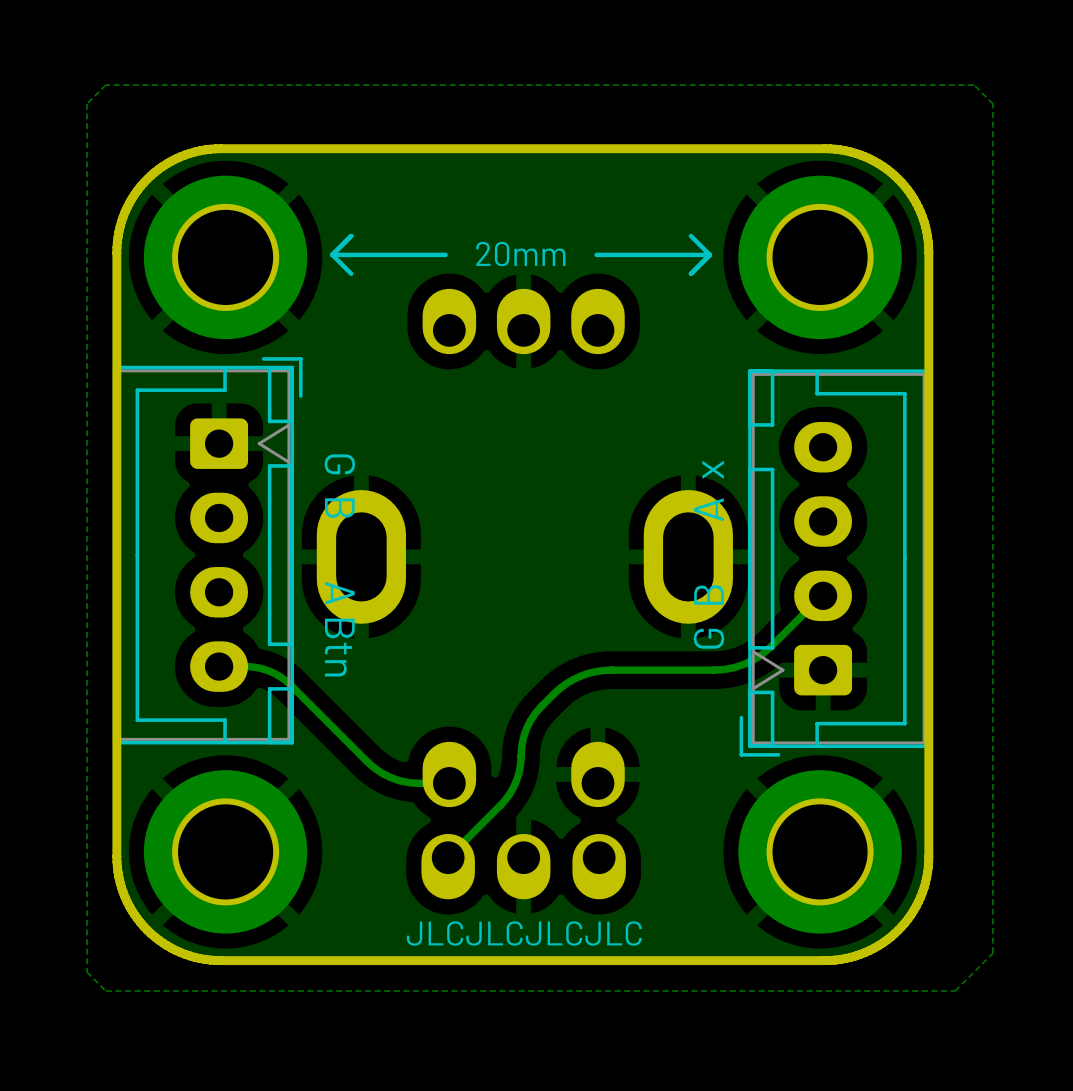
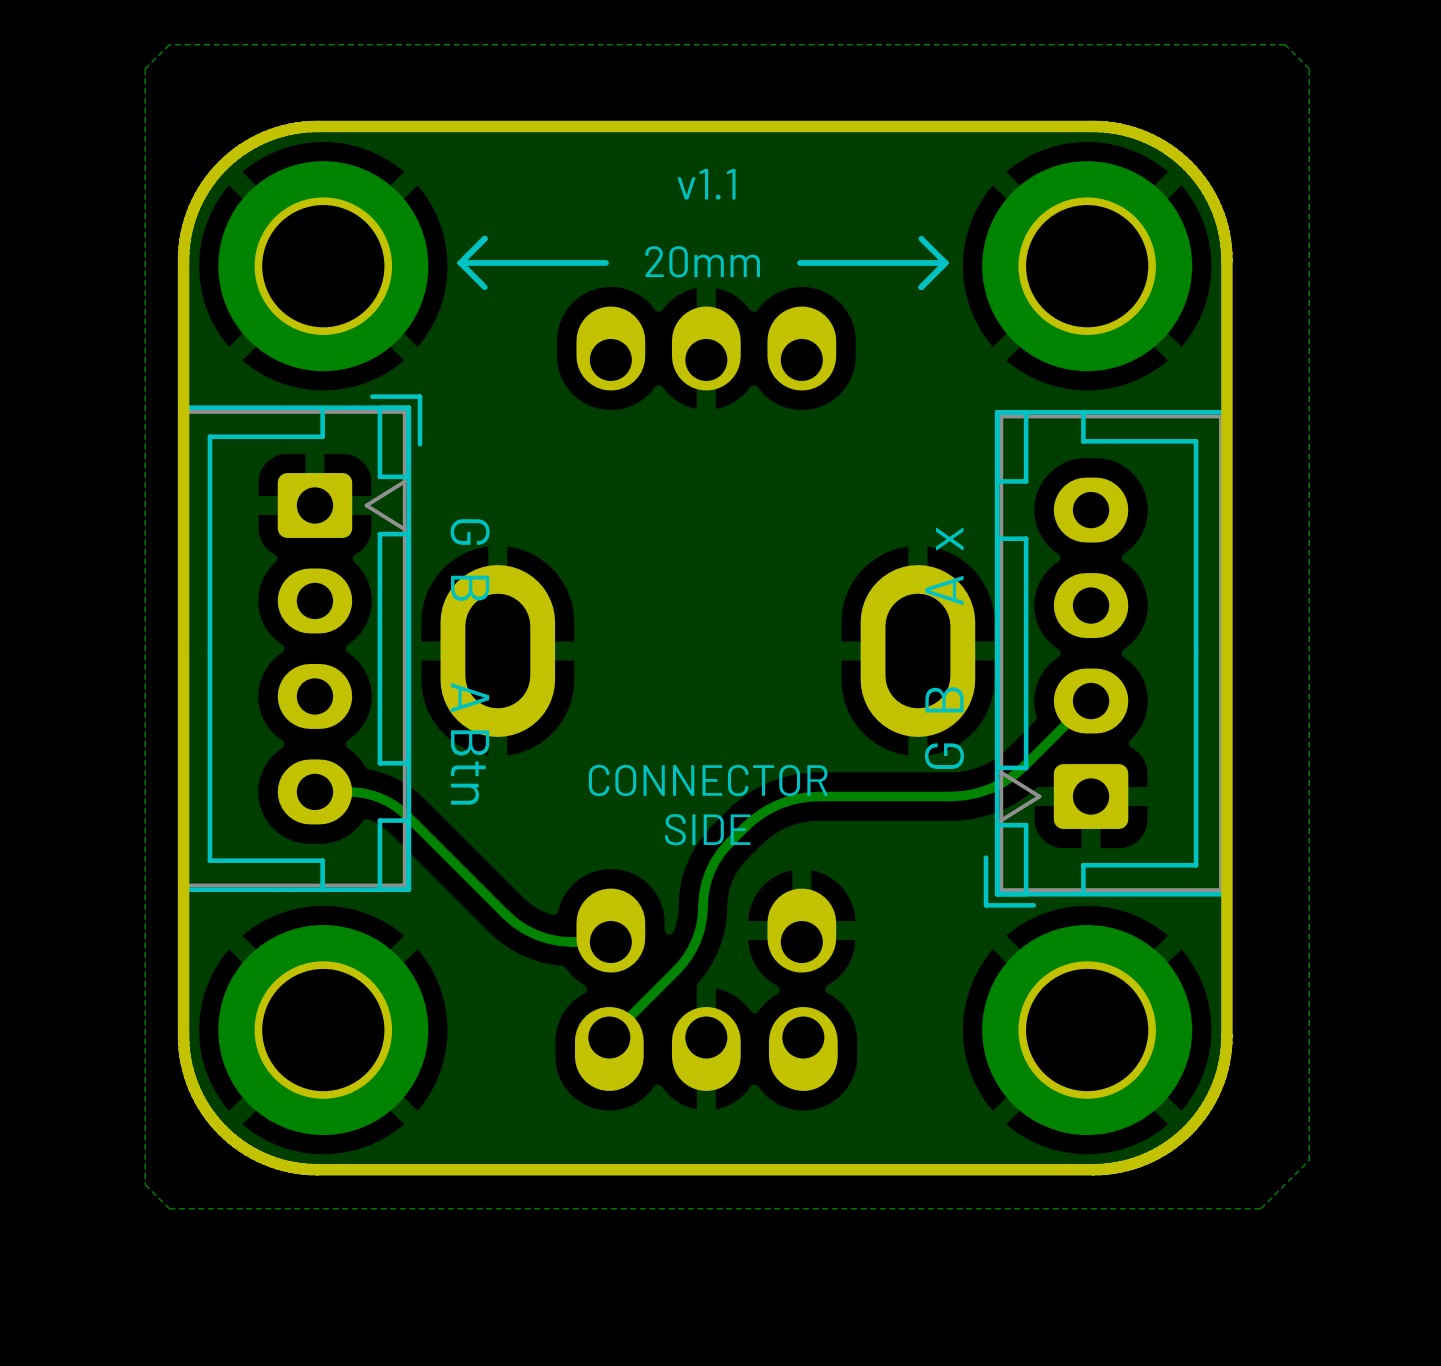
text: none -> v1.1 (706, 184)
text: none -> CONNECTOR (708, 780)
text: none -> SIDE (707, 829)
text: JLCJLCJLCJLC (524, 933) -> none

